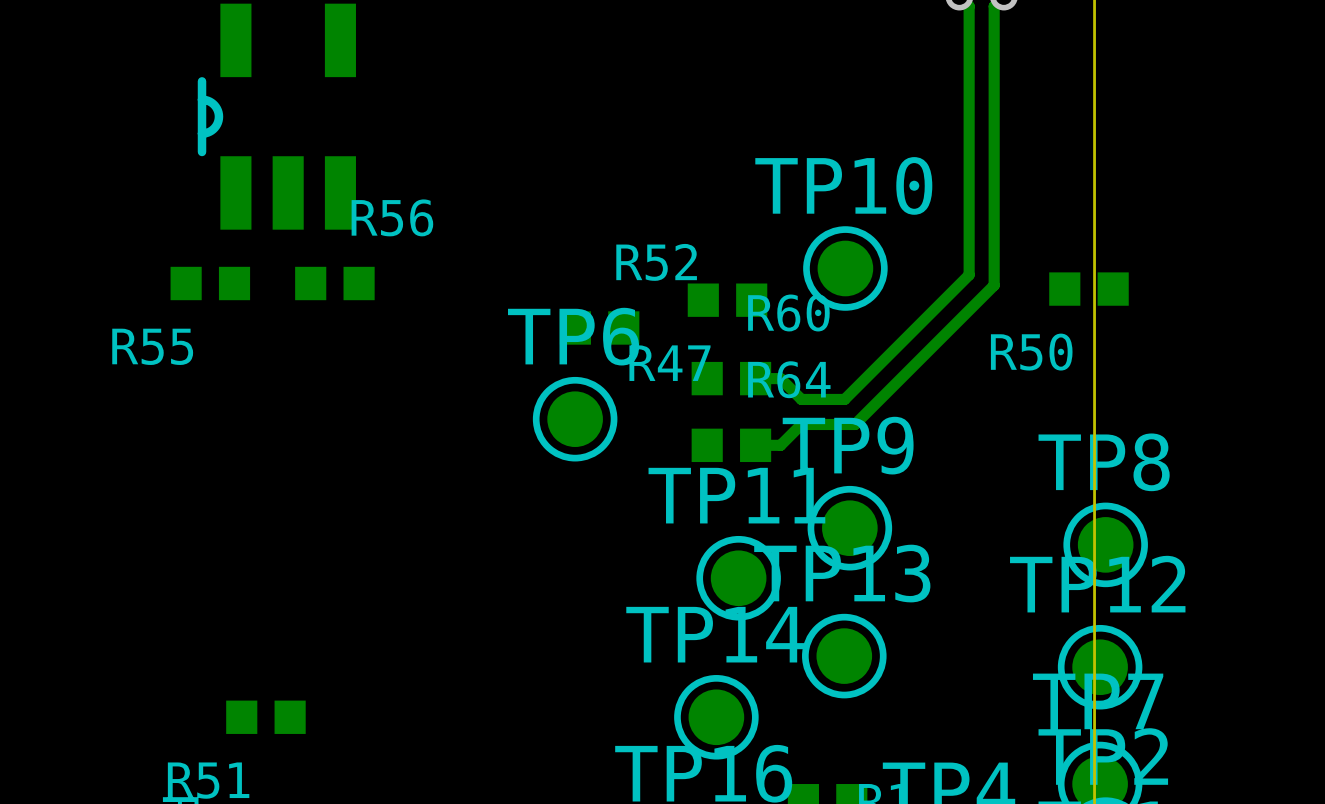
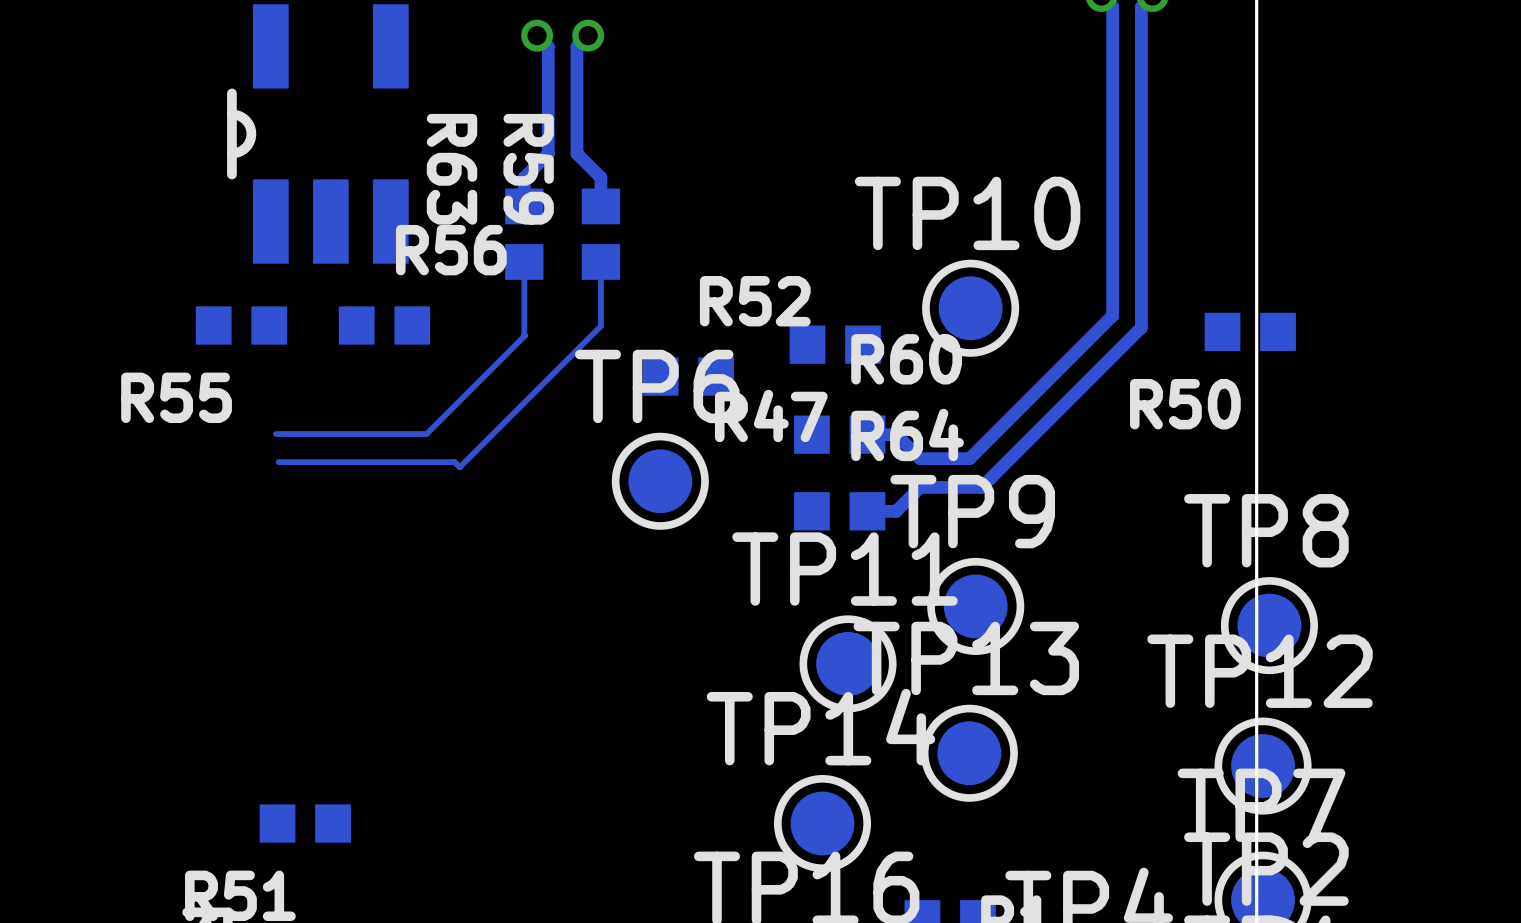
track: none -> (537, 35) (548, 46) (548, 153) (524, 177) (524, 206)
via: none -> (537, 35)
track: none -> (588, 35) (577, 46) (577, 153) (600, 177) (600, 206)
via: none -> (588, 35)
R63: none -> (524, 234)
R59: none -> (600, 234)
track: none -> (524, 261) (524, 335)
track: none -> (600, 261) (600, 326) (459, 467) (454, 462) (278, 462)
track: none -> (524, 335) (426, 434) (275, 434)

